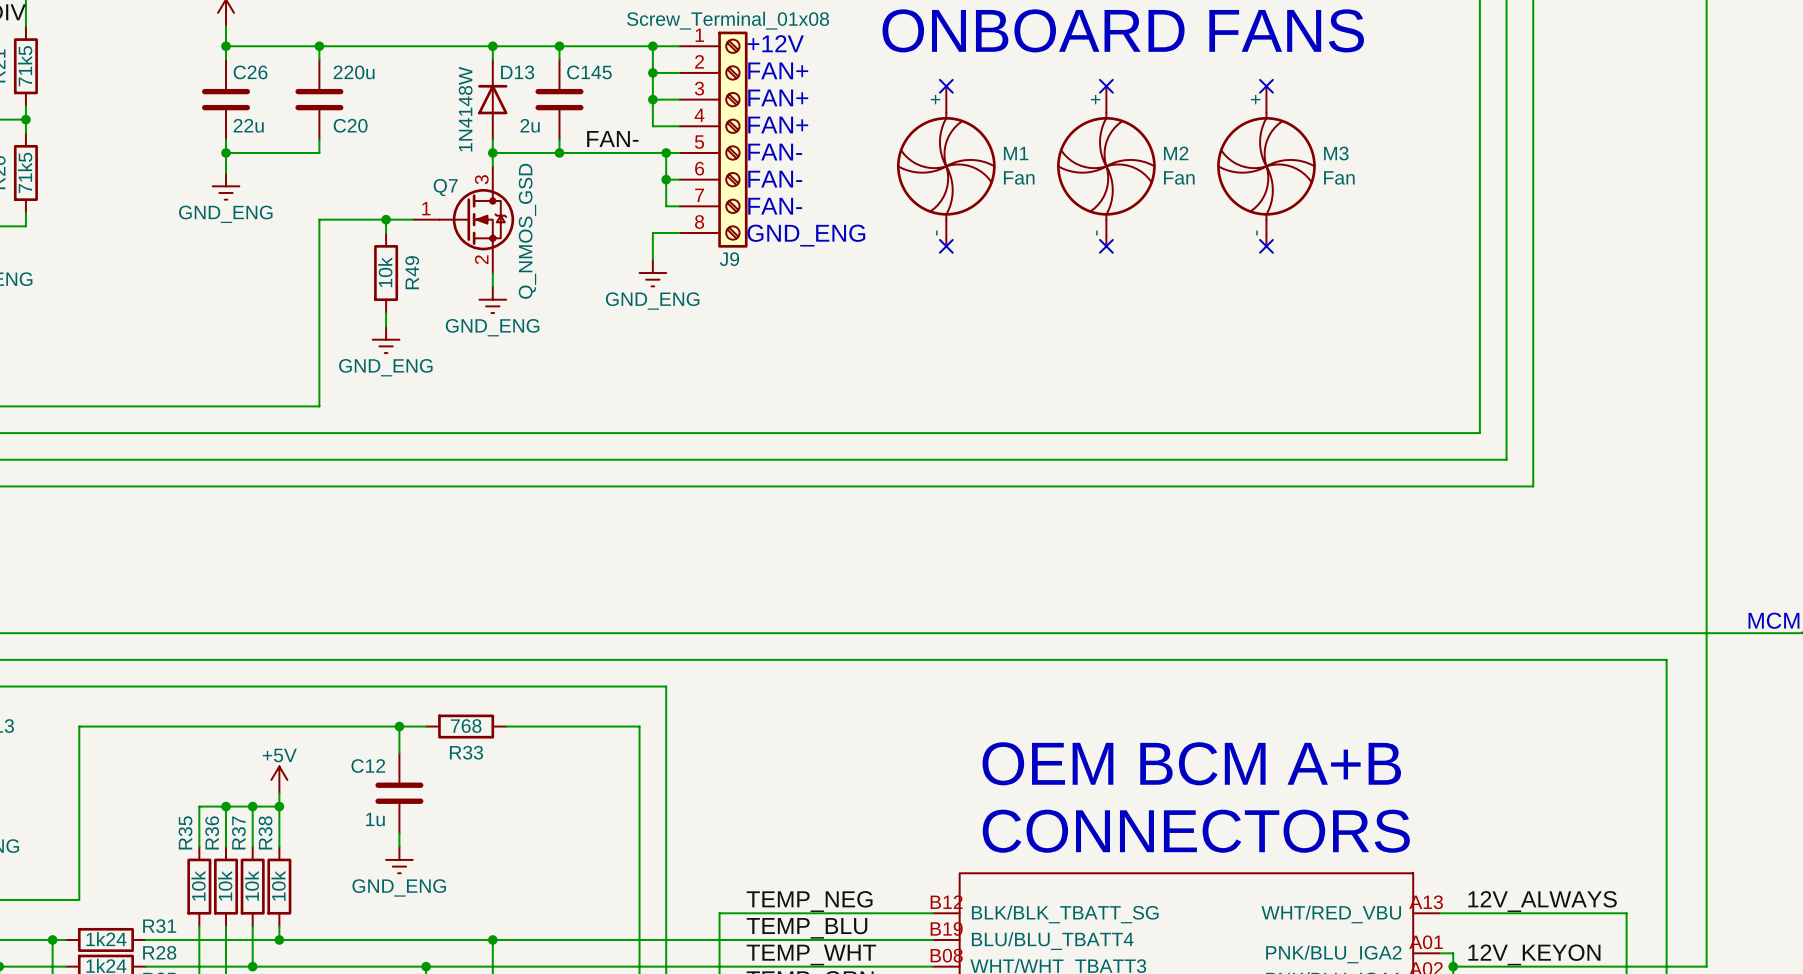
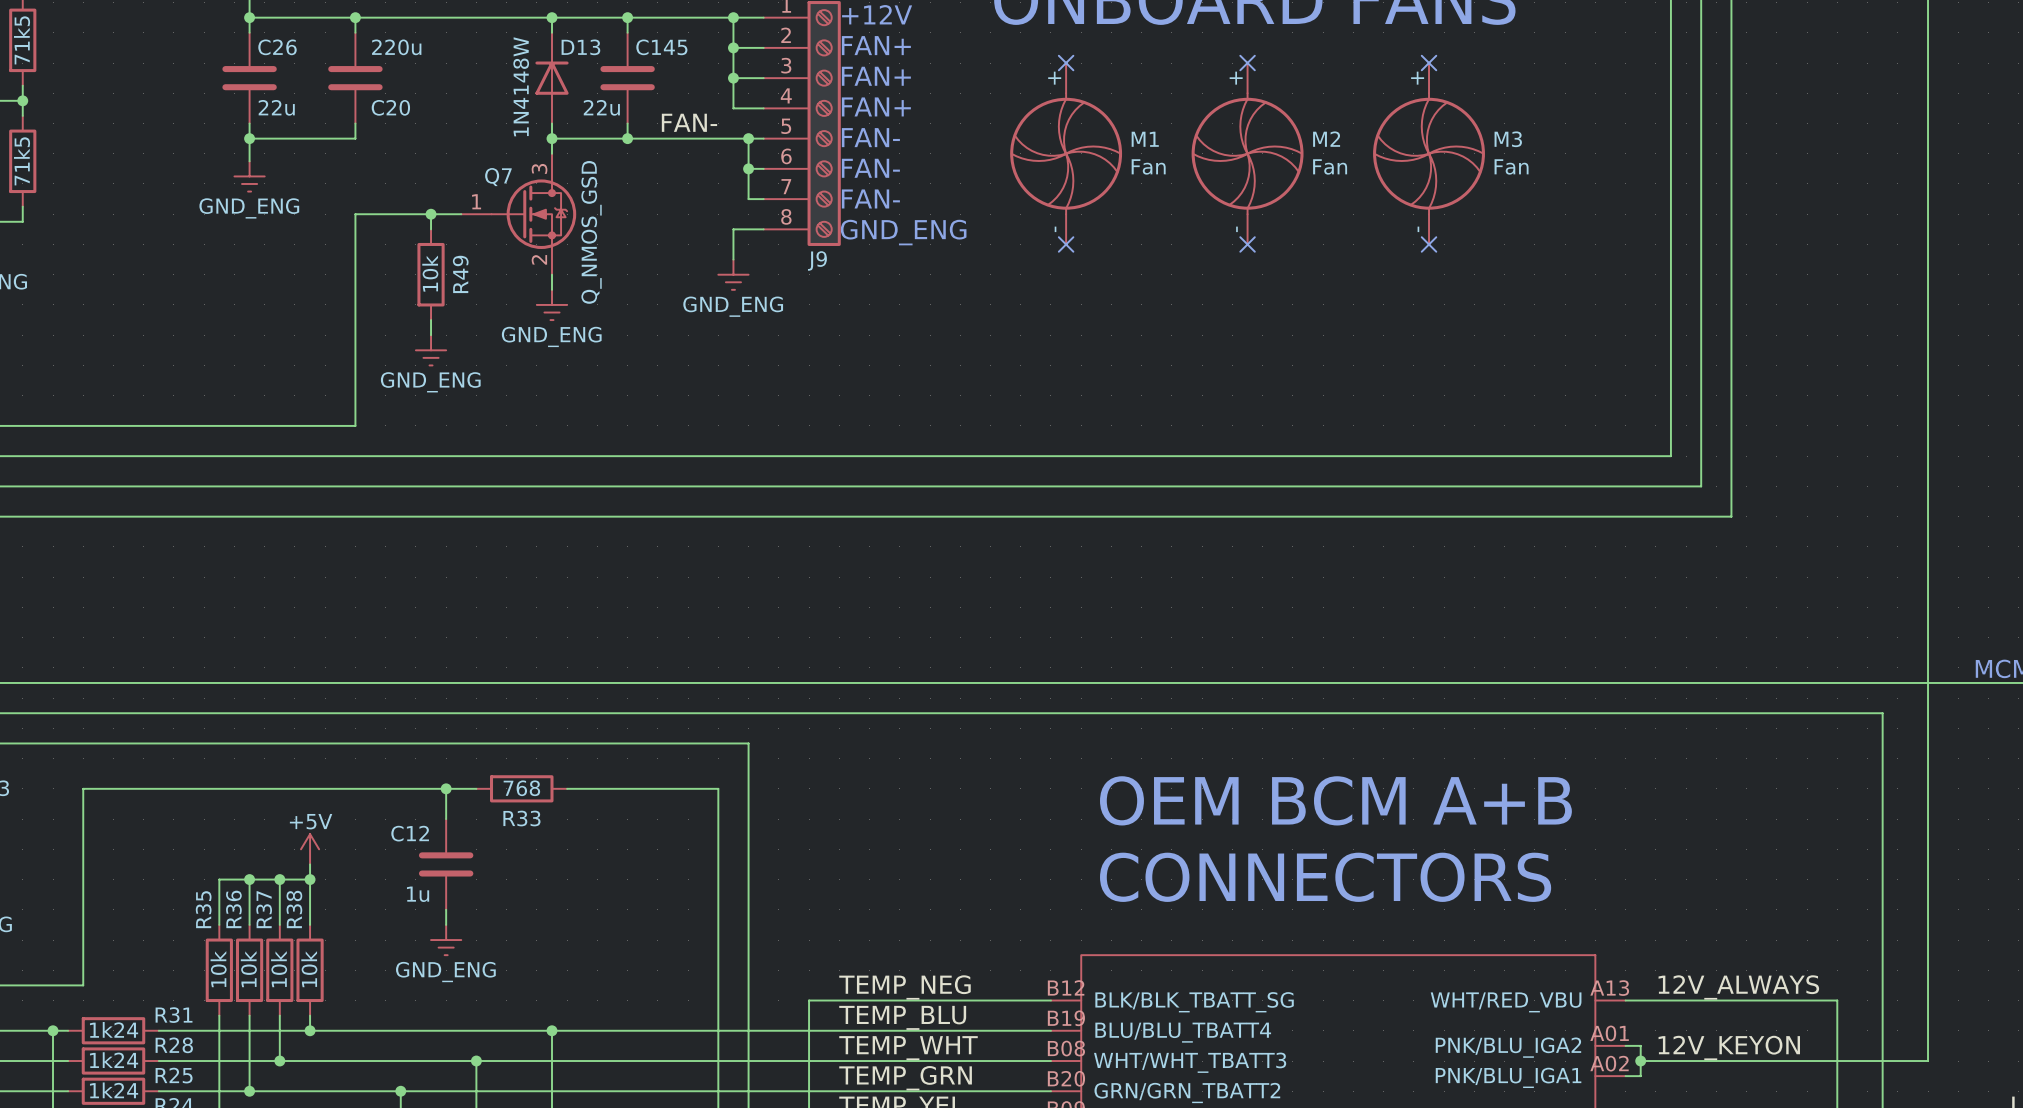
C145 value: 2u (530, 125) -> 22u (601, 107)
text position: OEM BCM A+B (1191, 763) -> OEM BCM A+B (1335, 800)
text position: CONNECTORS (1196, 831) -> CONNECTORS (1325, 877)

